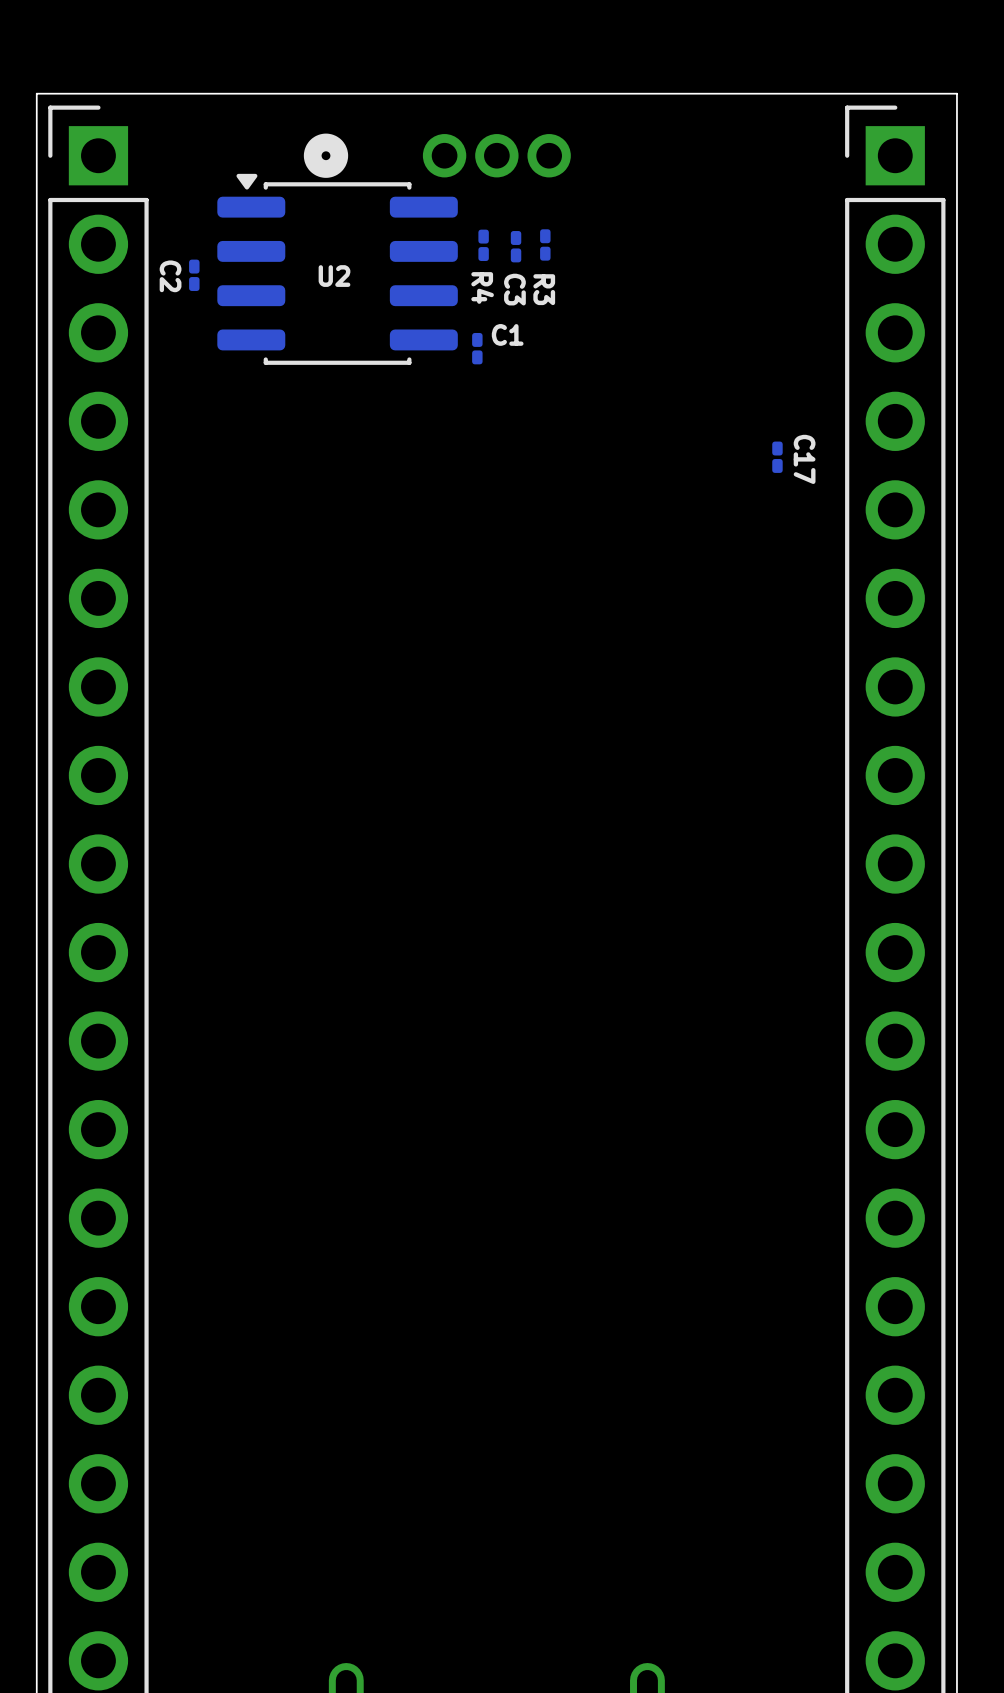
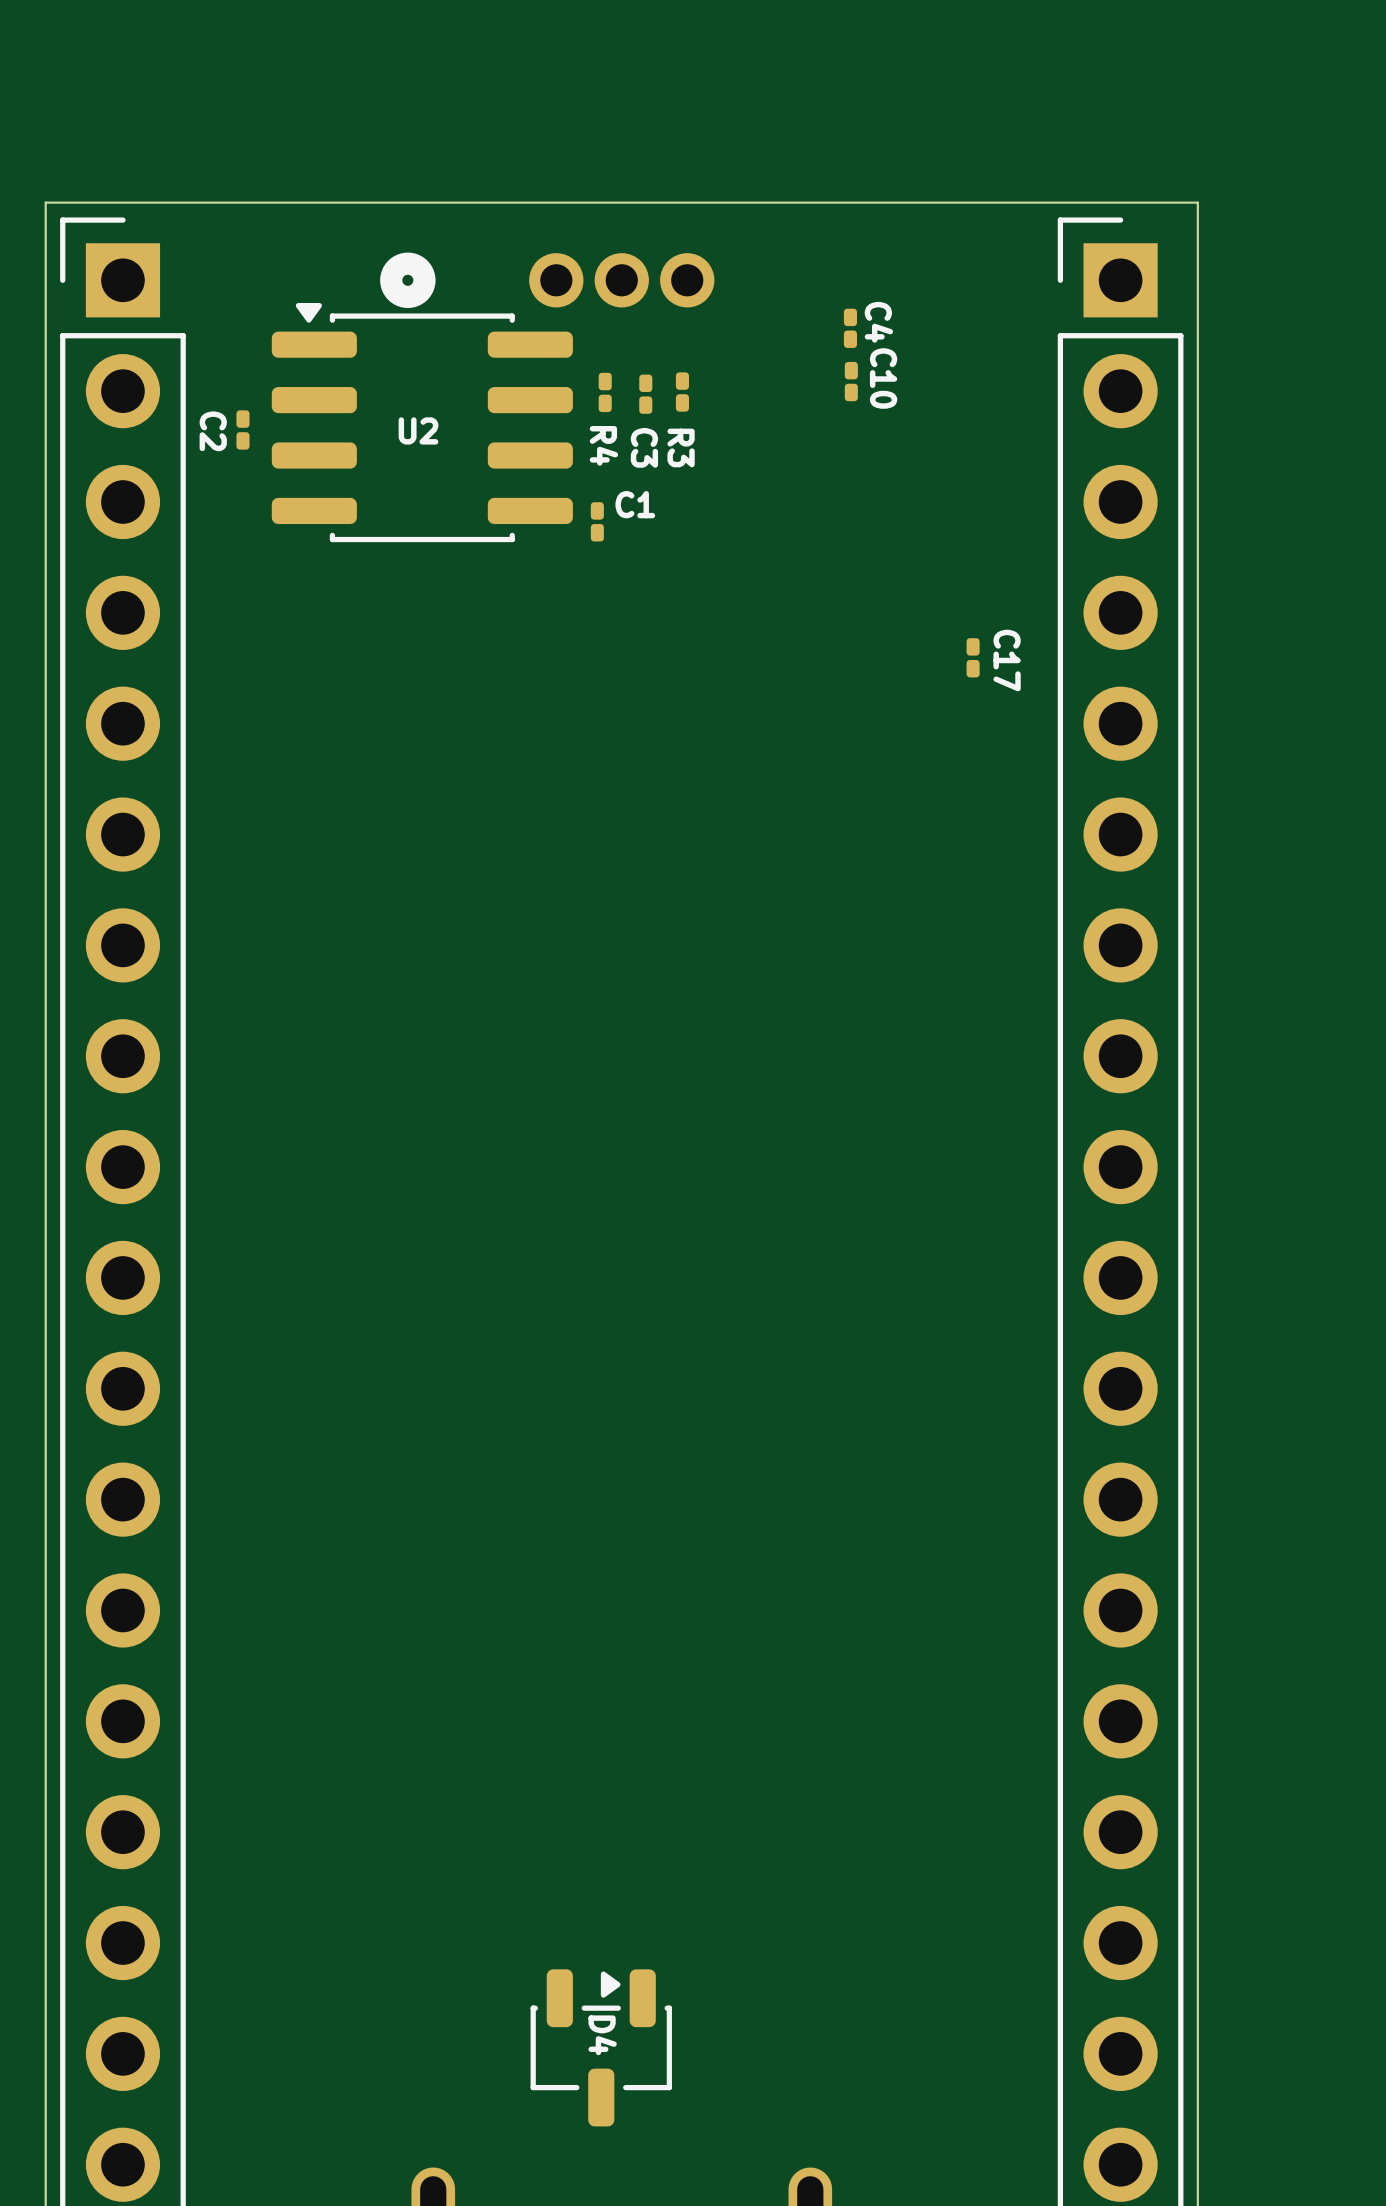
C4: none -> (850, 328)
C10: none -> (851, 381)
D4: none -> (601, 2047)

